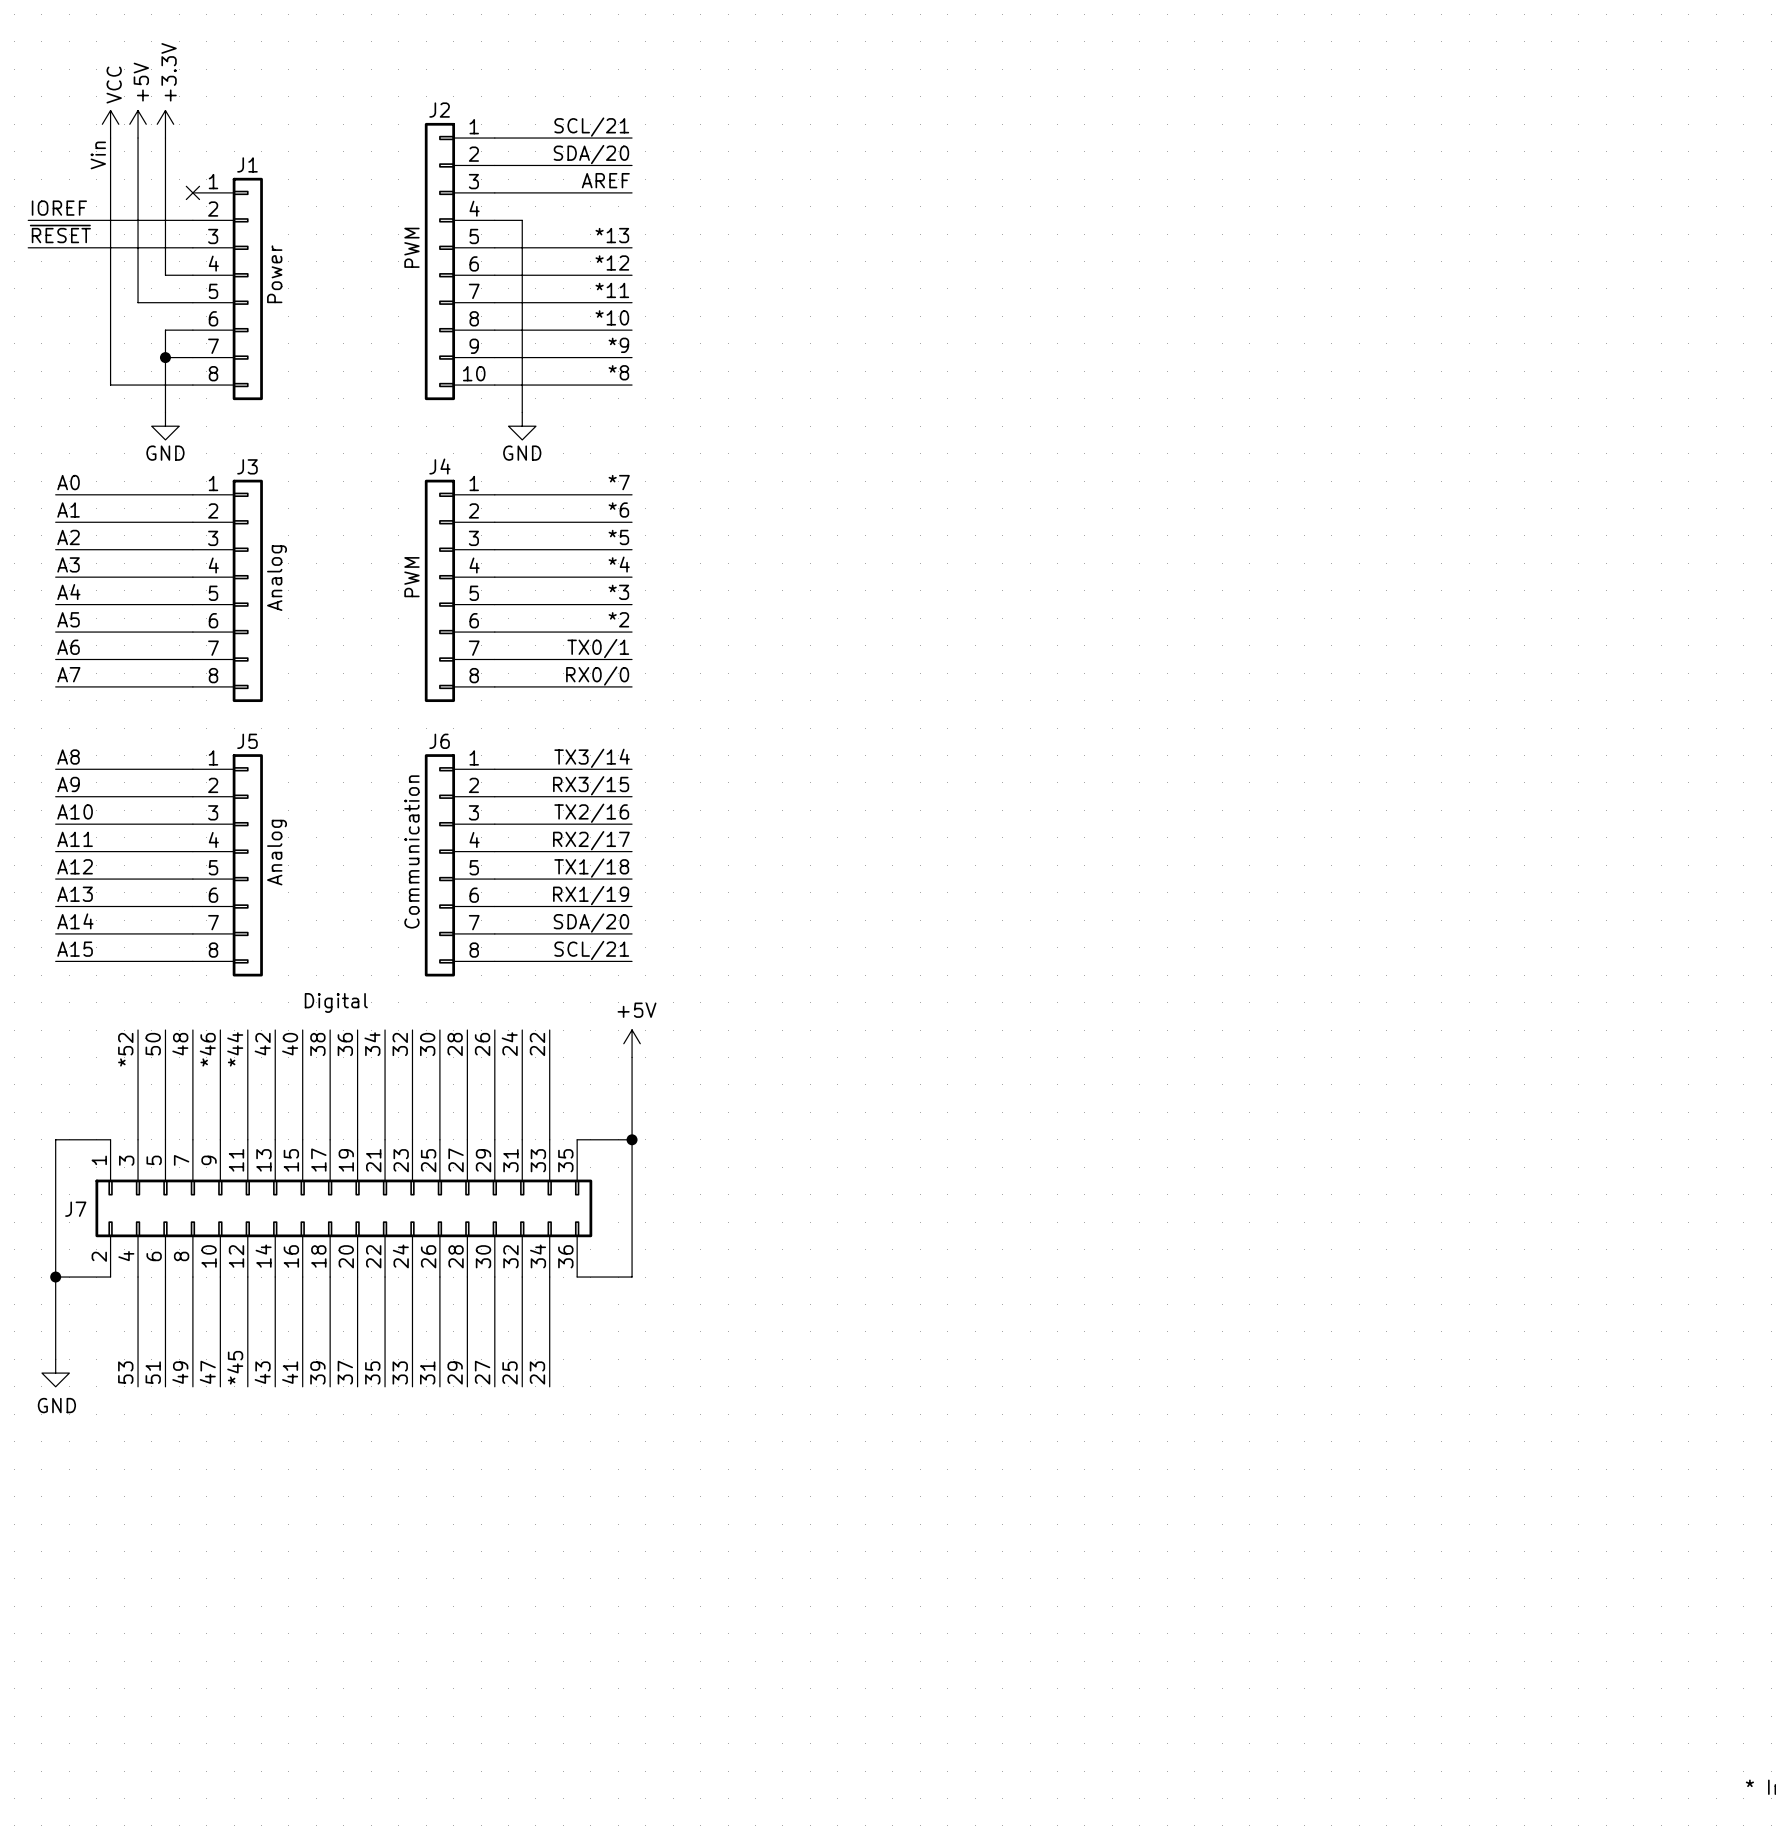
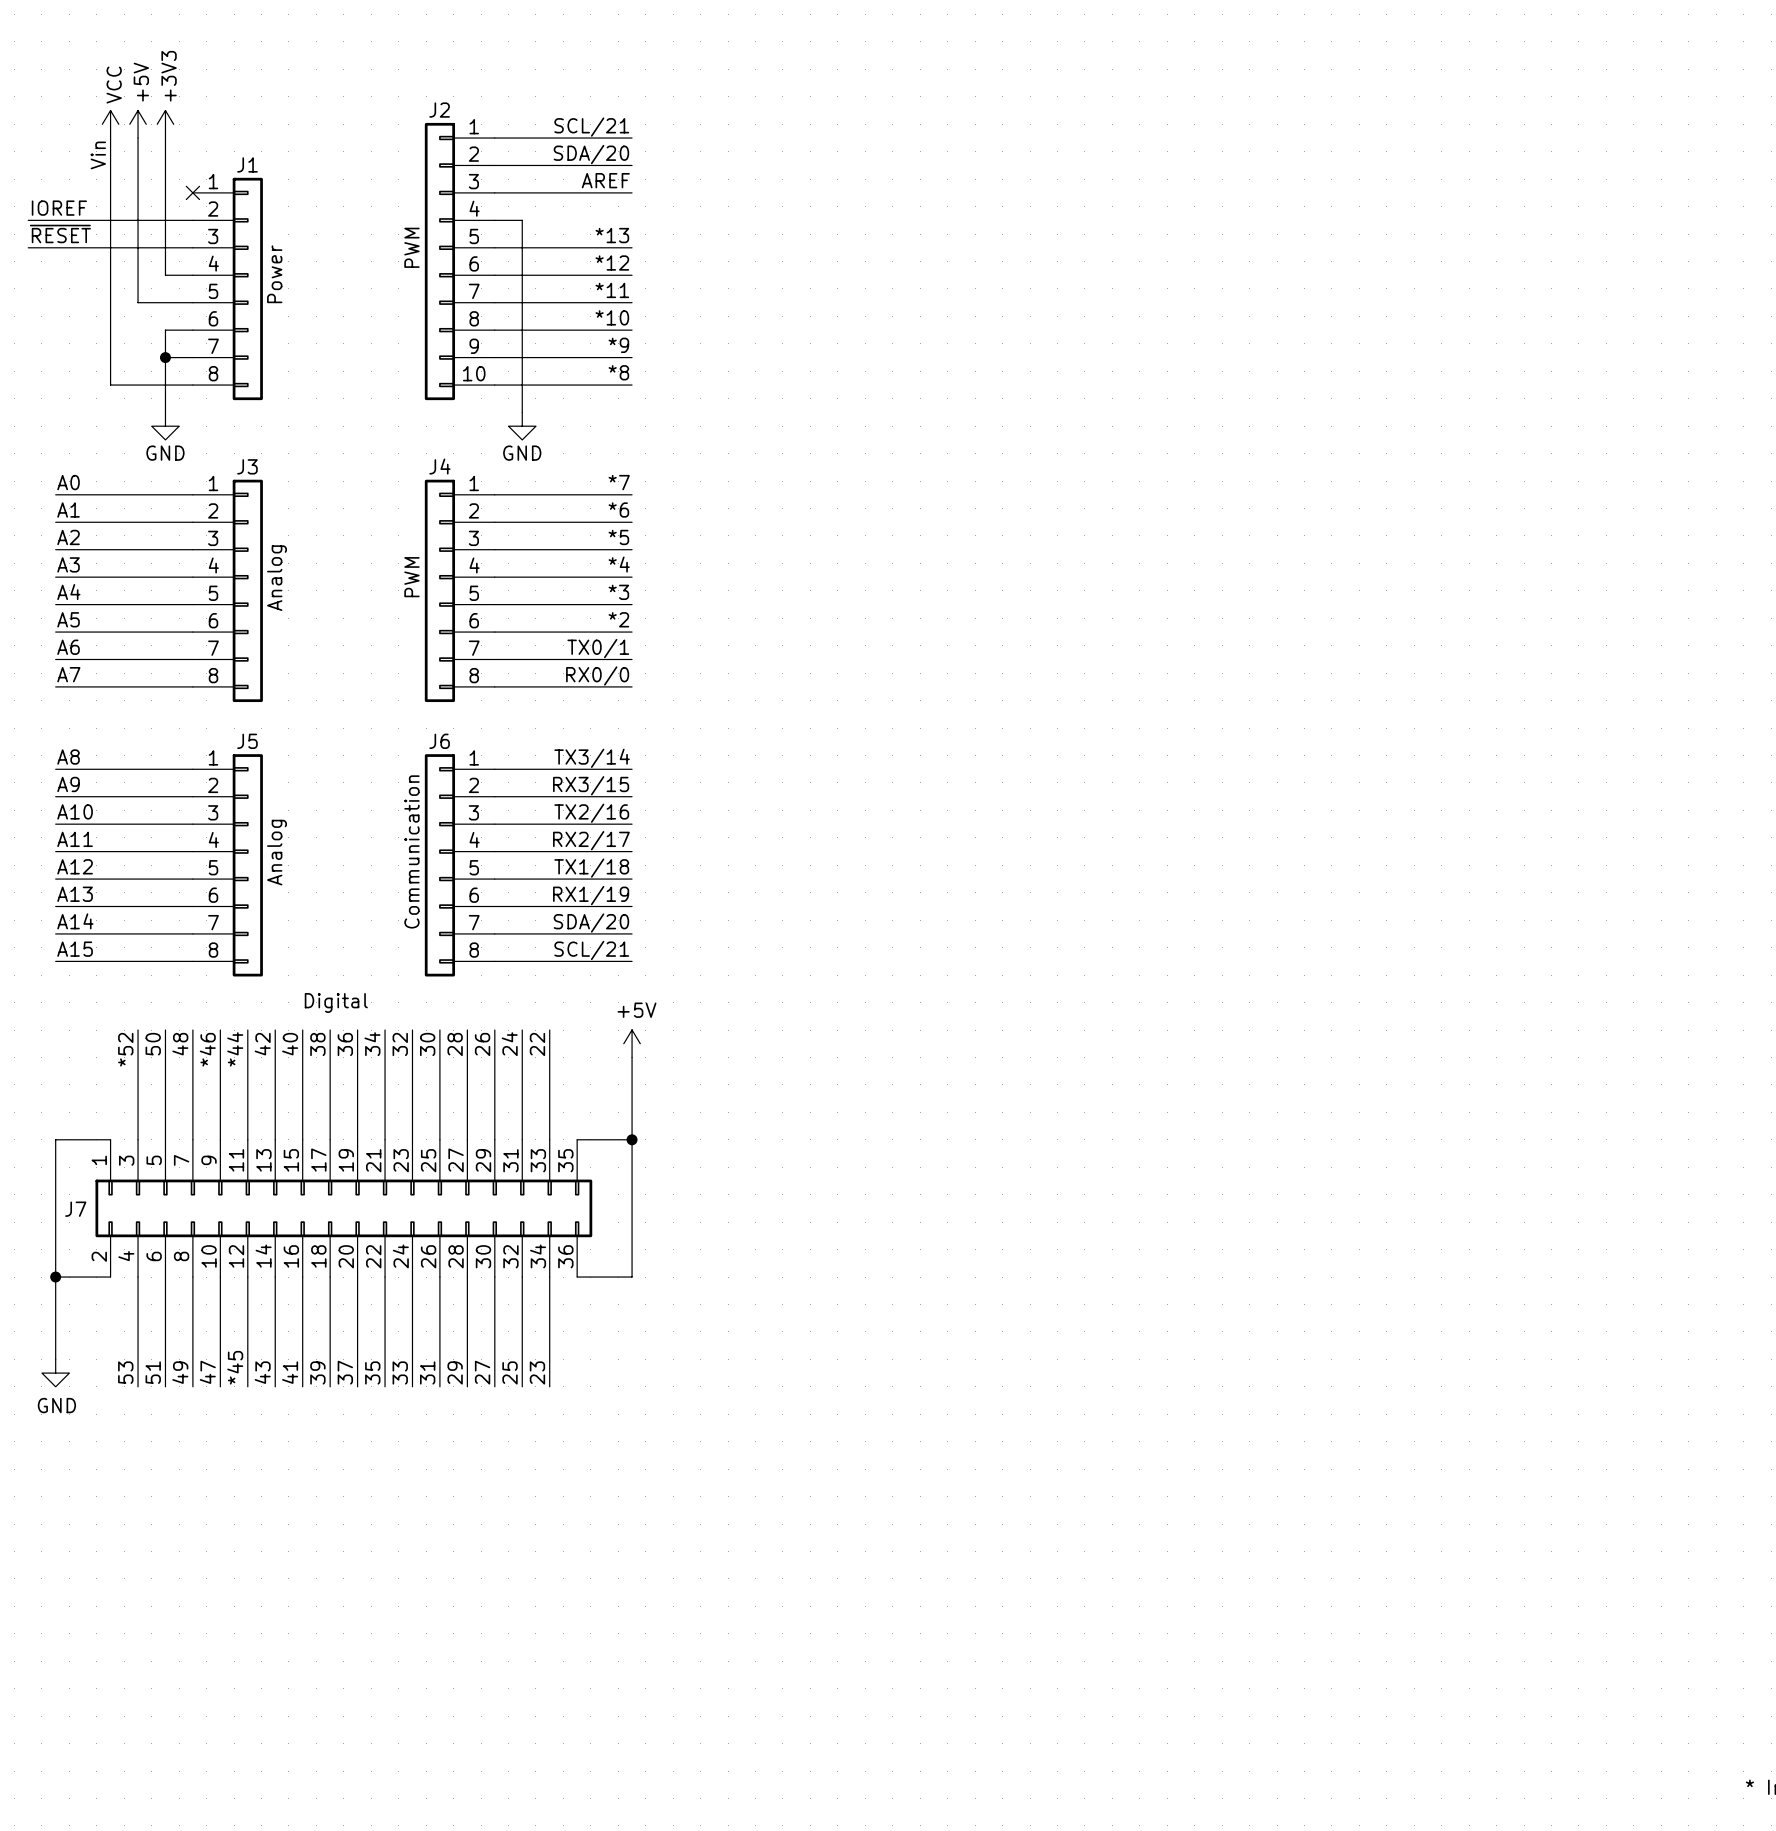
power symbol: +3.3V (165, 124) -> +3V3 (165, 124)

